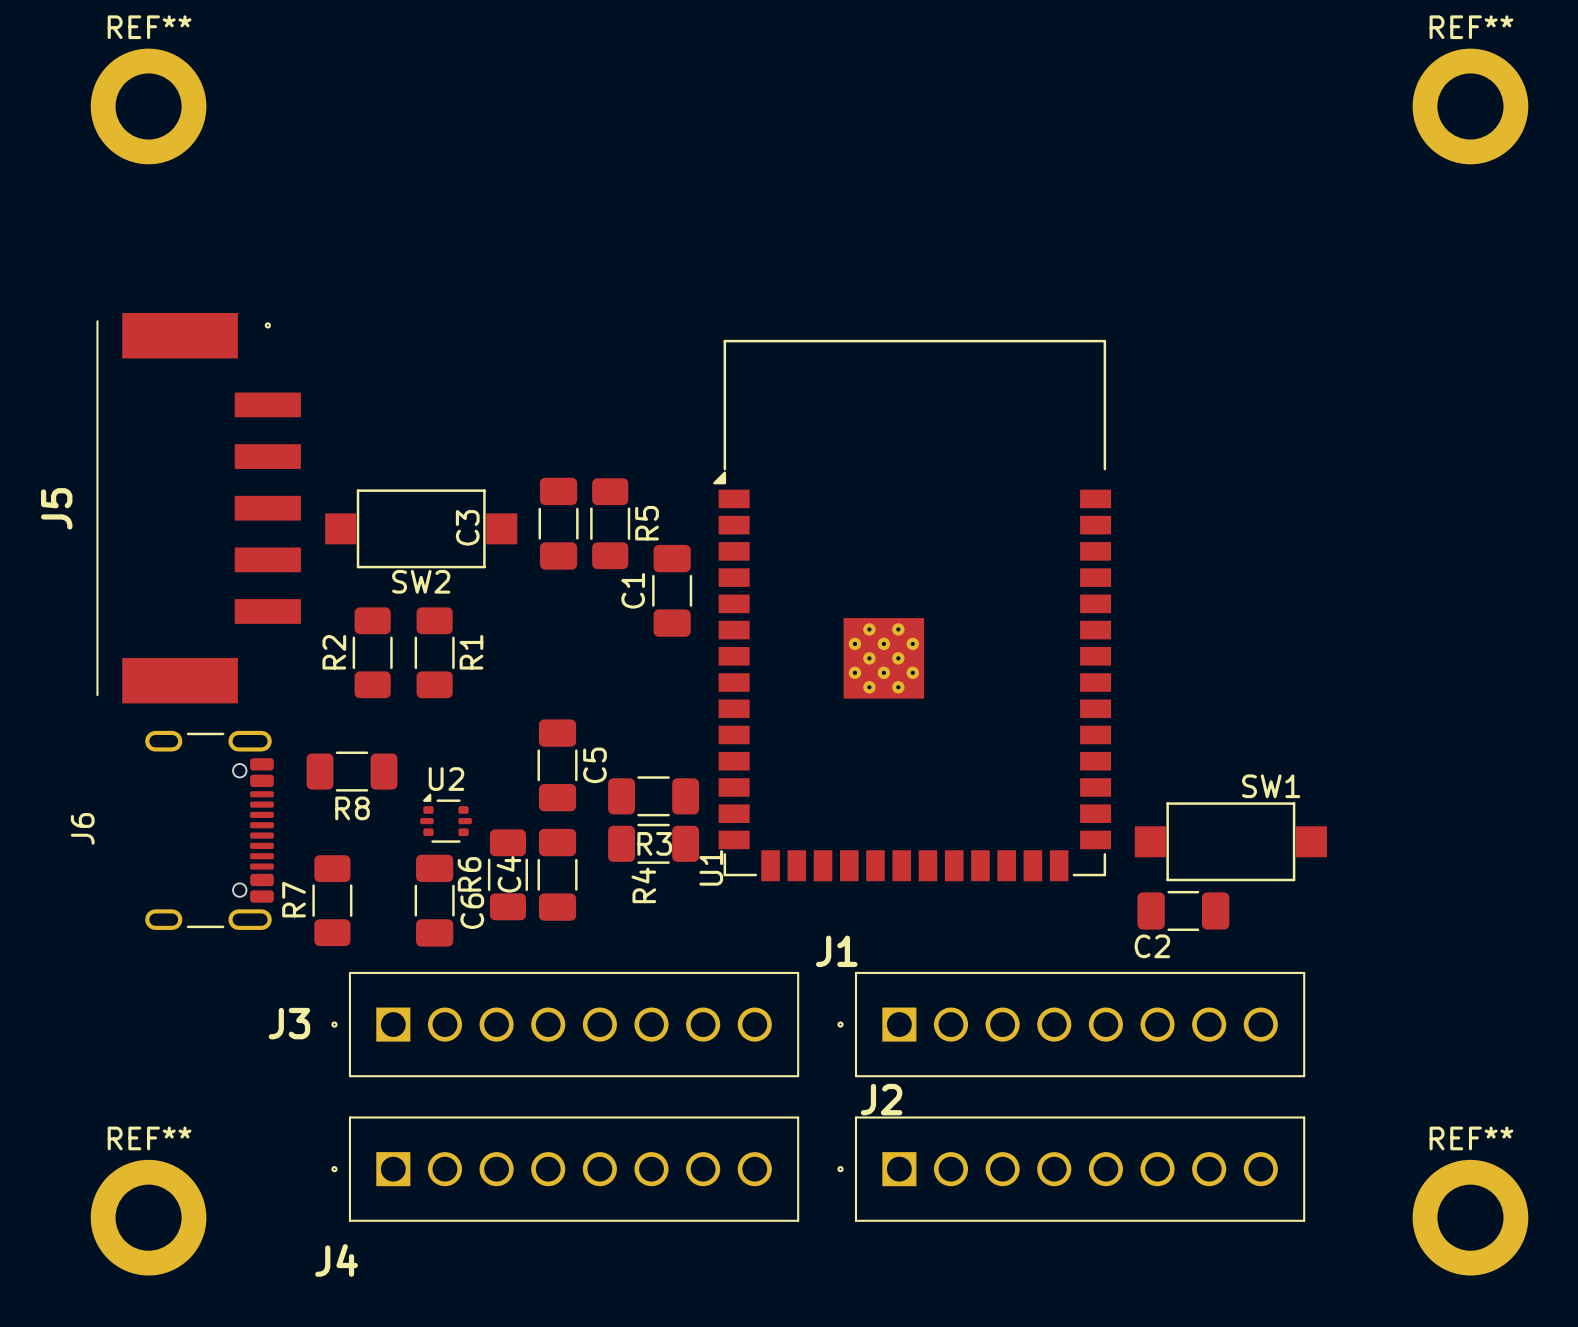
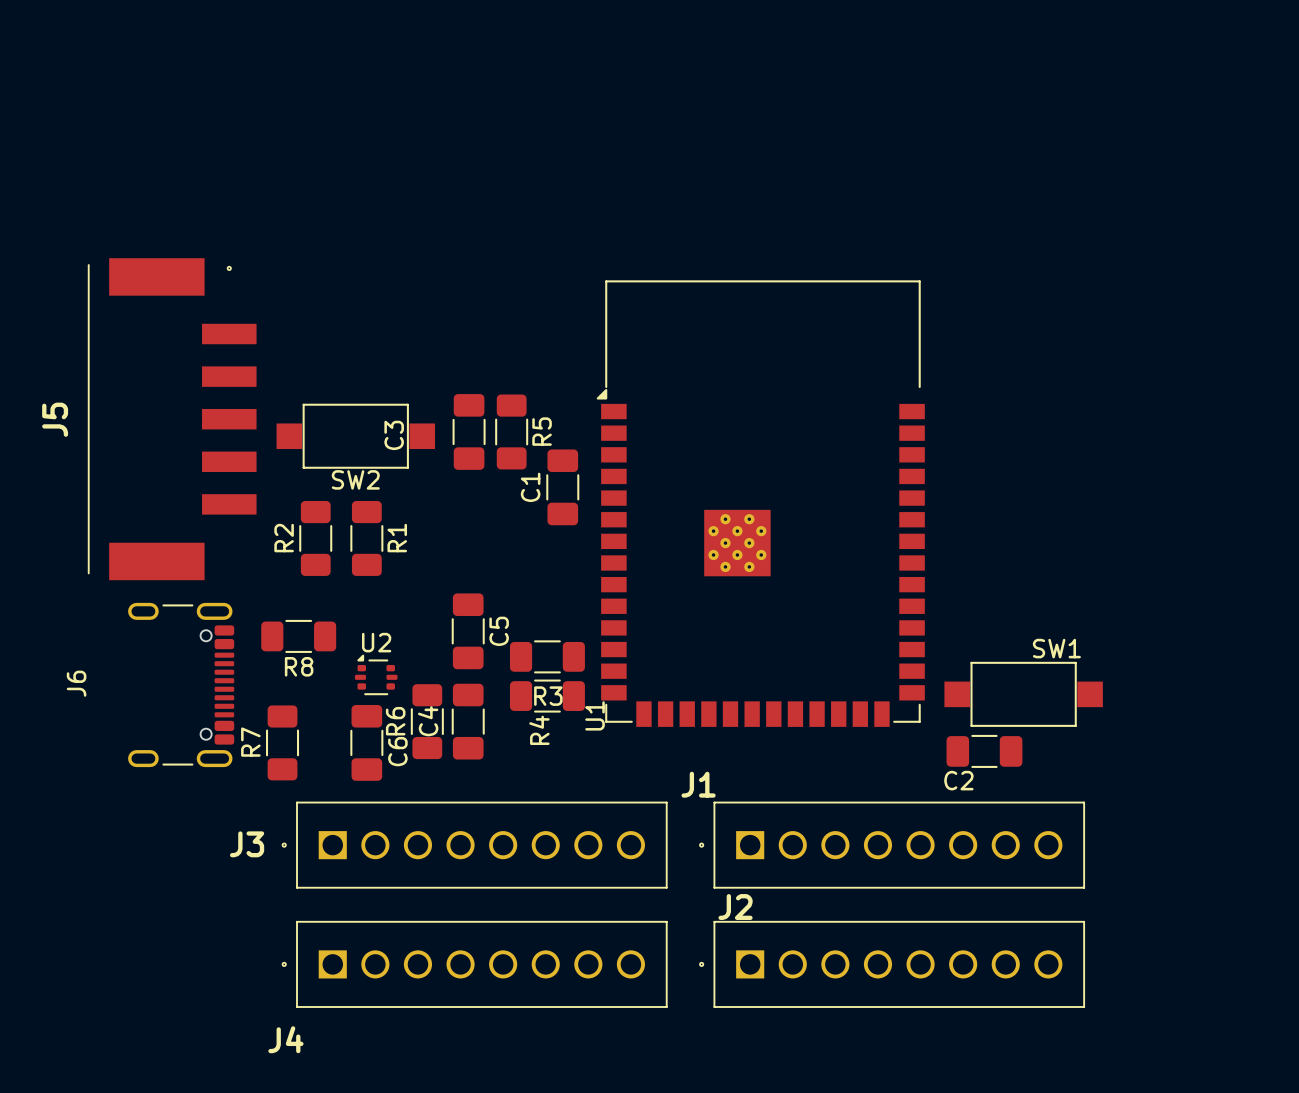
REF**: (148, 106) -> none
REF**: (1470, 106) -> none
REF**: (148, 1217) -> none
REF**: (1470, 1217) -> none

